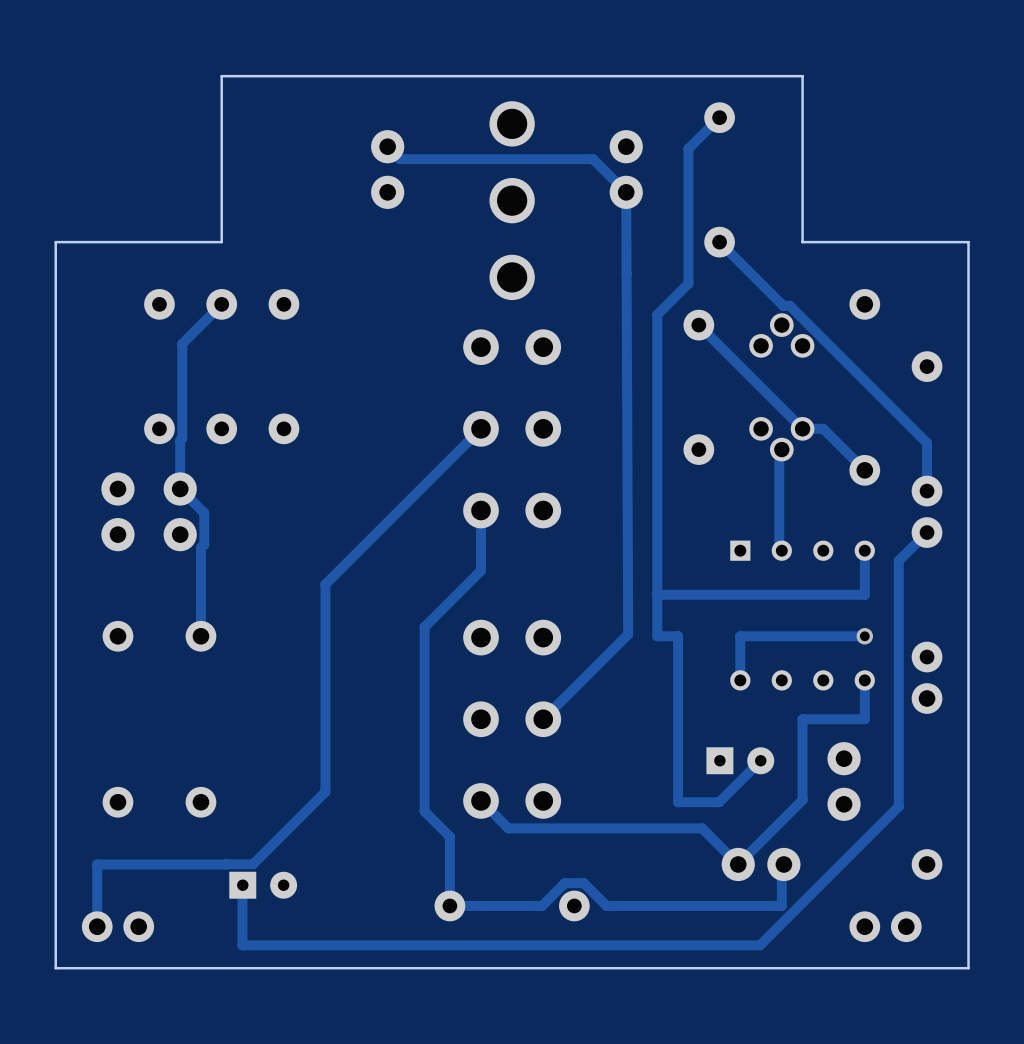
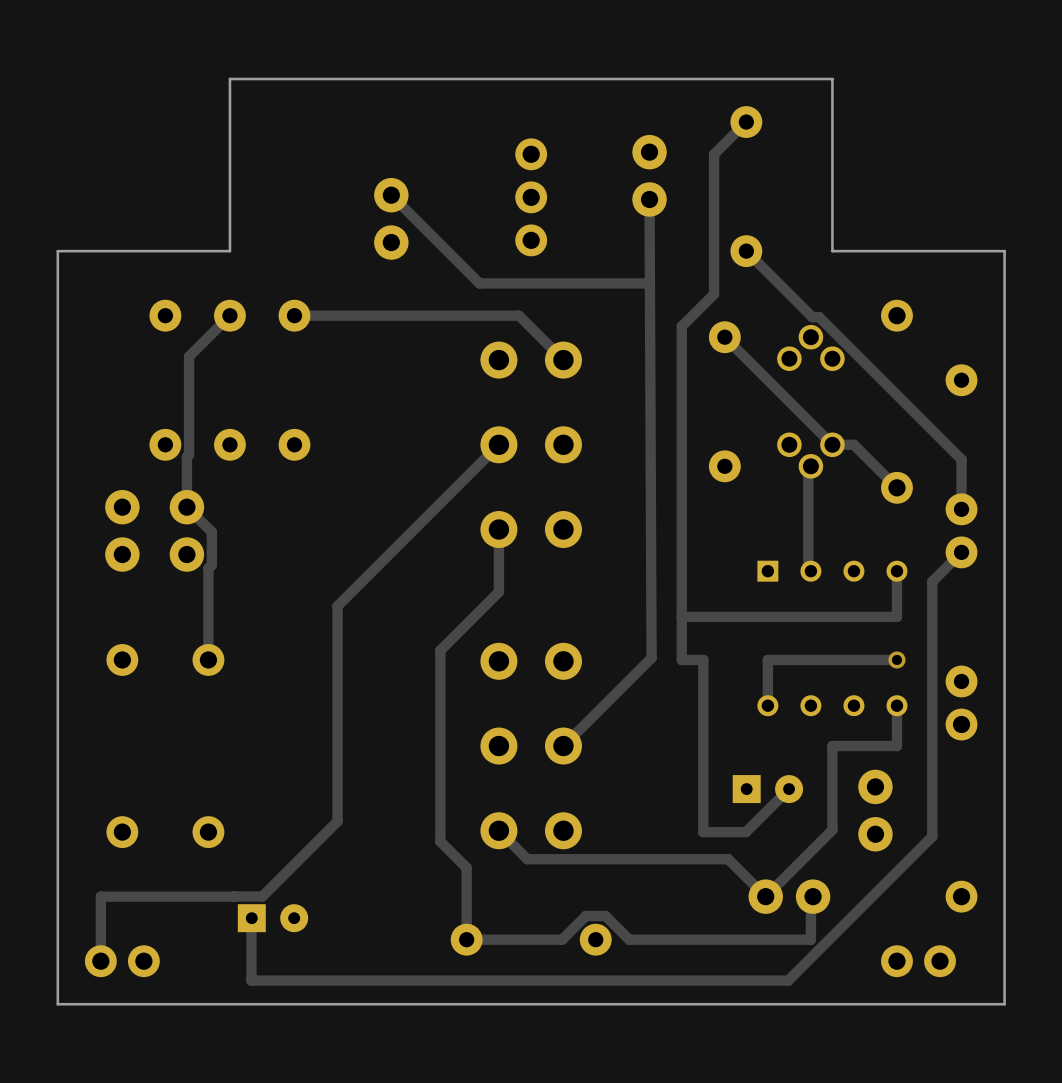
part footprint: [489, 101, 535, 301] -> [515, 138, 548, 257]
track: (387, 146) (400, 159) (593, 159) (626, 192) -> none
part position: (387, 169) -> (391, 218)
track: none -> (391, 195) (479, 283) (649, 283)
track: none -> (294, 315) (519, 315) (563, 360)

